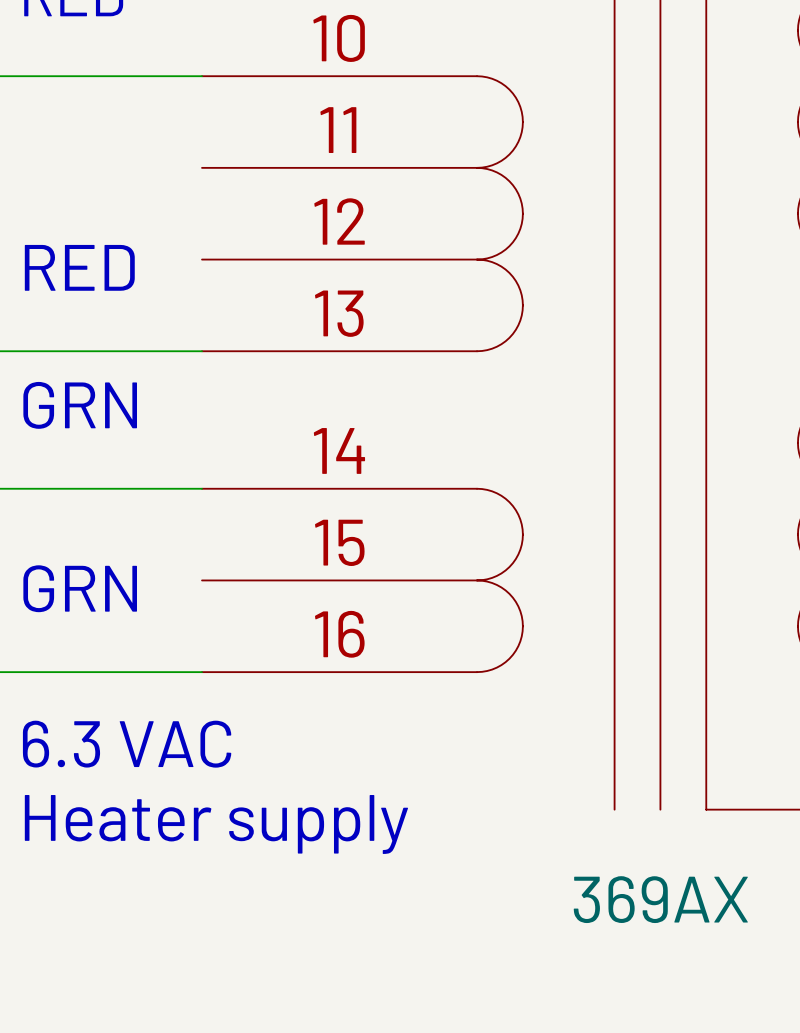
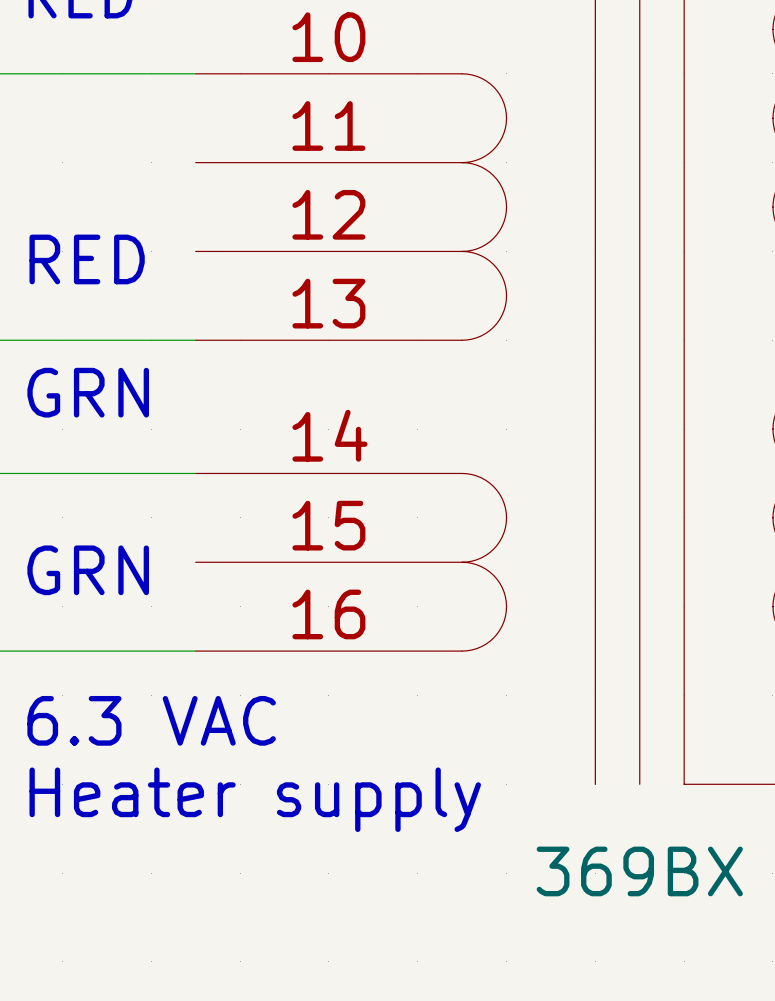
part value: 369AX (660, 899) -> 369BX (639, 871)

